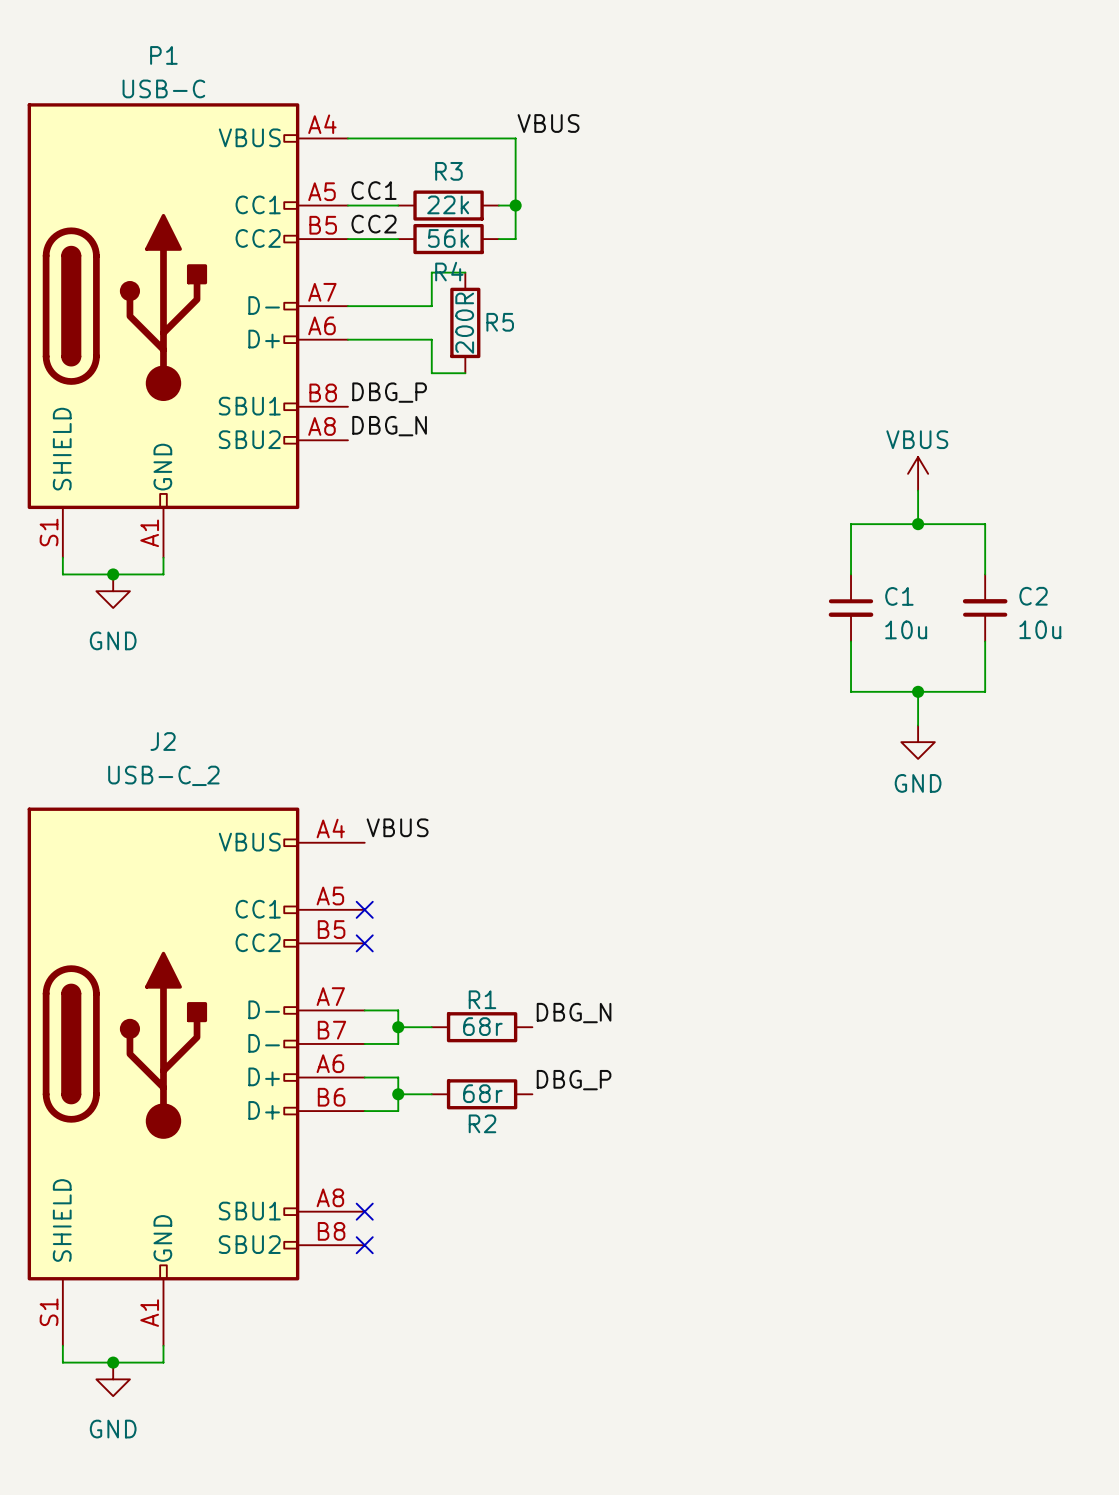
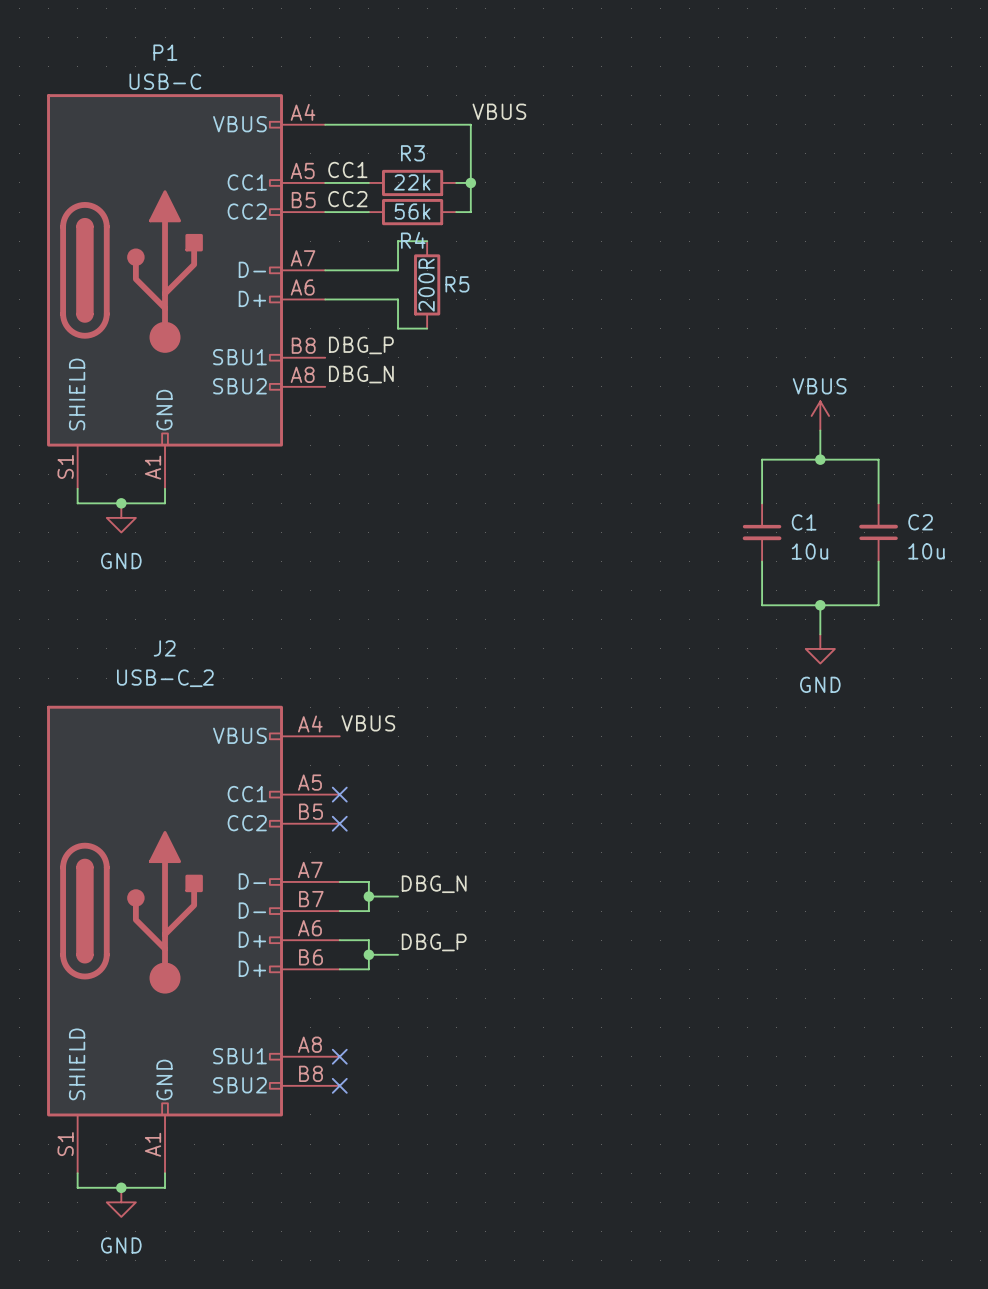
label position: DBG_N (574, 1013) -> DBG_N (434, 884)
R1: 68r (482, 1027) -> none
label position: DBG_P (574, 1080) -> DBG_P (434, 942)
R2: 68r (482, 1094) -> none

